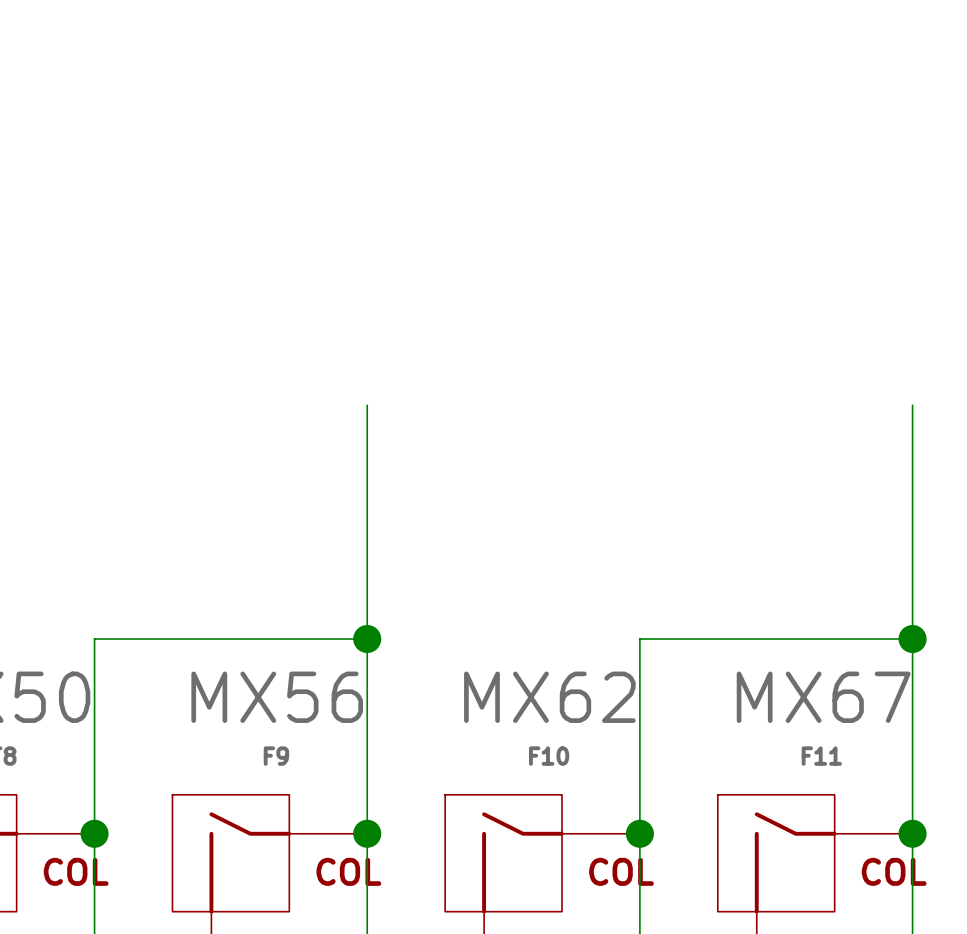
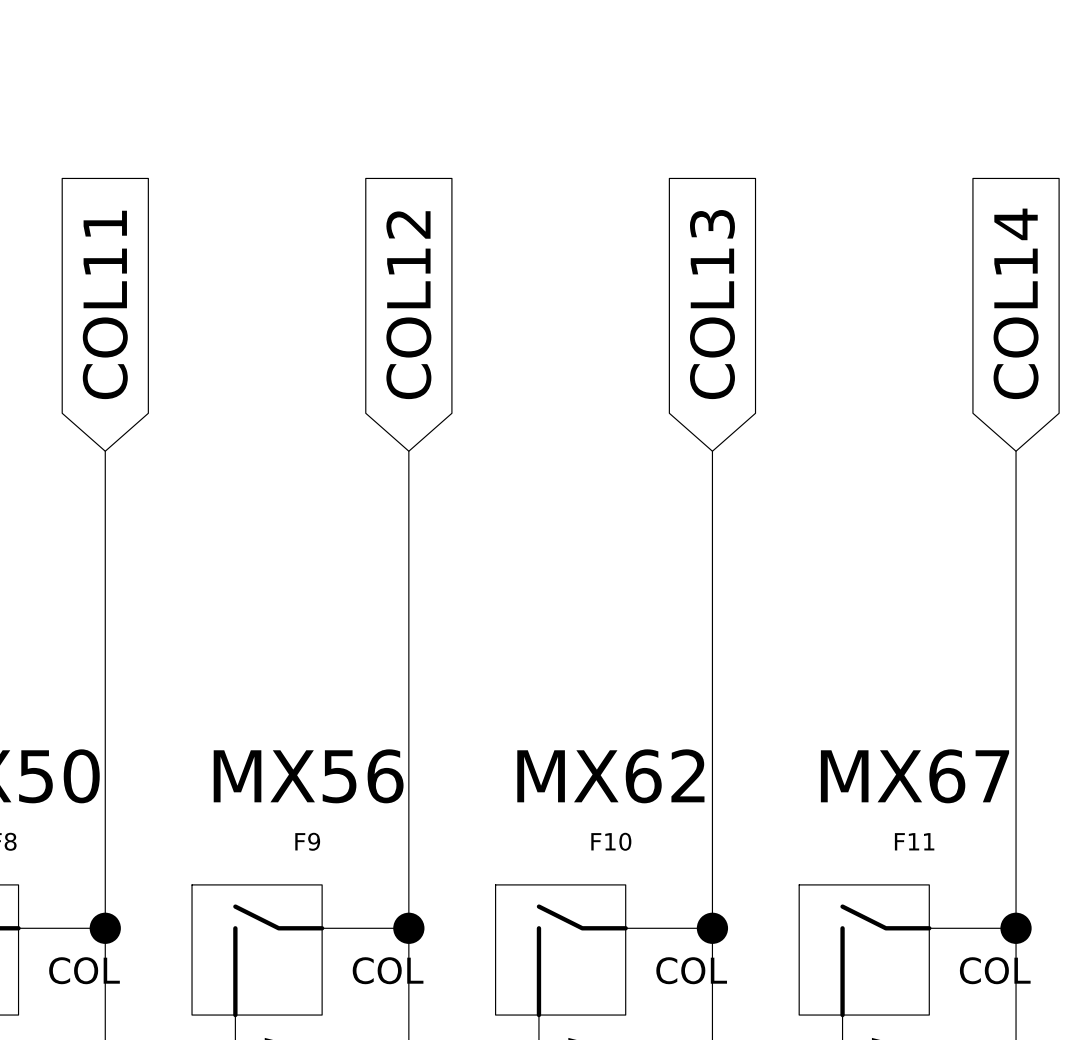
global label: none -> COL14 (1016, 303)
global label: none -> COL11 (105, 304)
global label: none -> COL12 (408, 305)
global label: none -> COL13 (712, 304)
wire: (94, 639) (367, 639) -> (105, 711) (105, 451)
junction: (367, 639) -> none
wire: (639, 639) (912, 639) -> (712, 711) (712, 451)
junction: (912, 639) -> none

